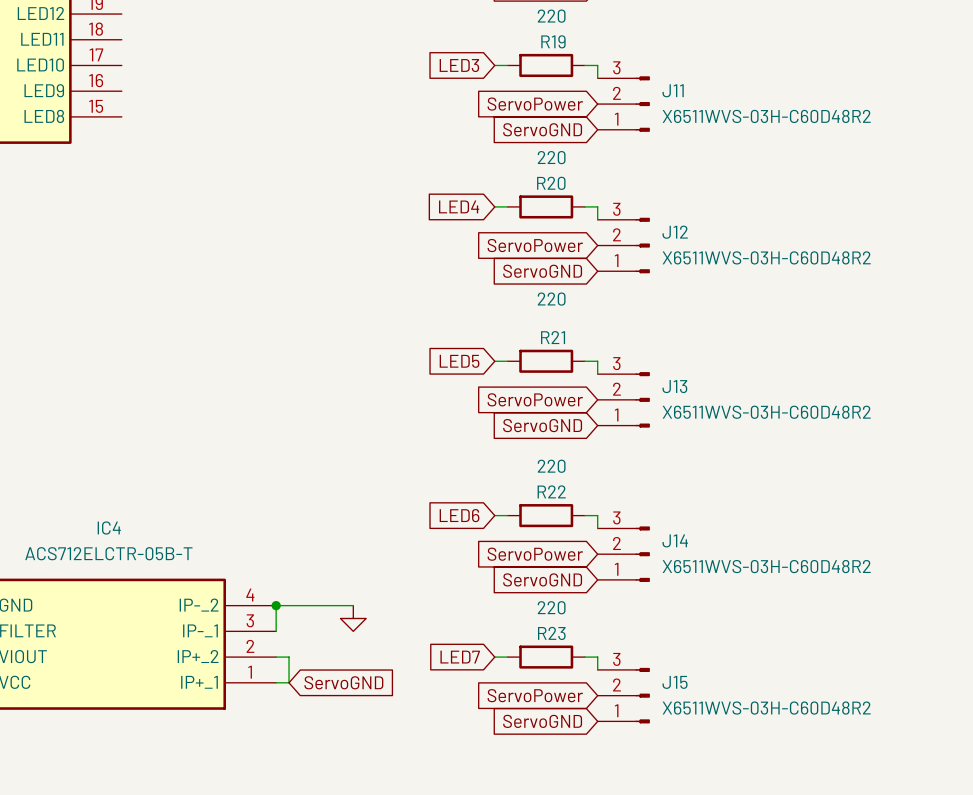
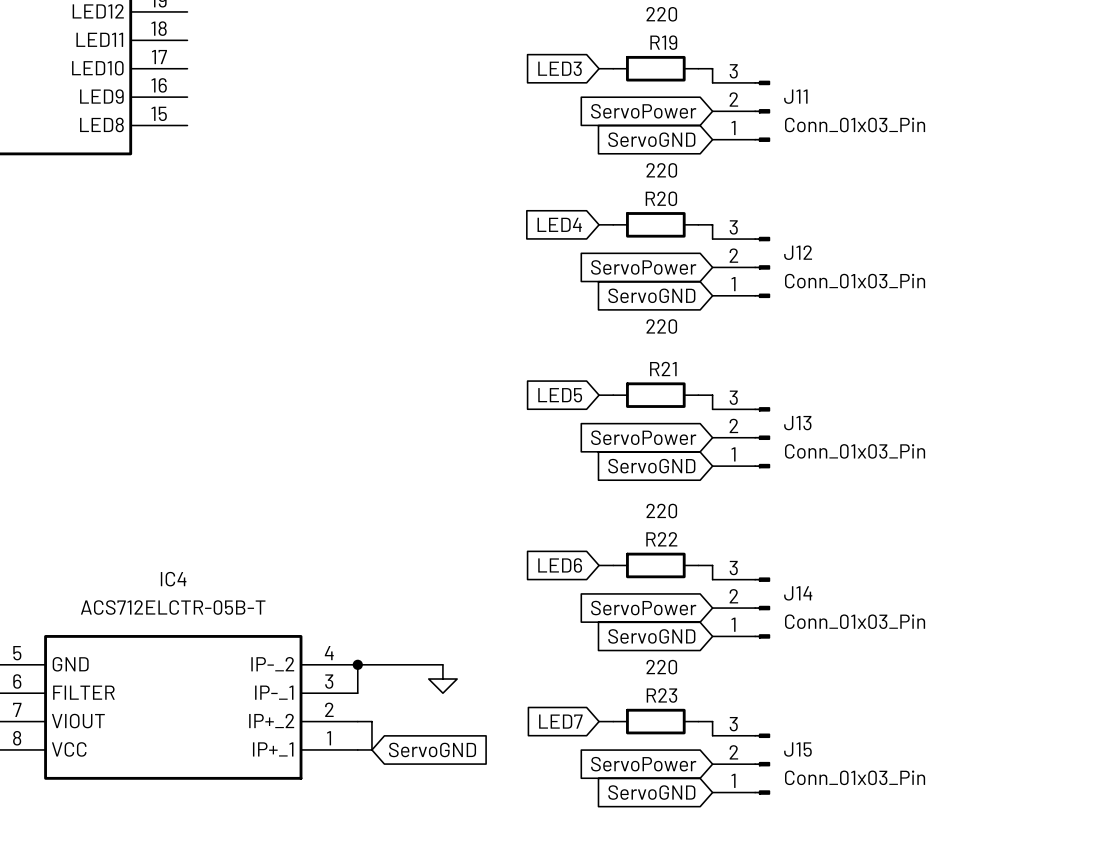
J11 value: X6511WVS-03H-C60D48R2 (766, 116) -> Conn_01x03_Pin (855, 124)
J12 value: X6511WVS-03H-C60D48R2 (766, 257) -> Conn_01x03_Pin (855, 281)
J13 value: X6511WVS-03H-C60D48R2 (766, 412) -> Conn_01x03_Pin (855, 451)
J14 value: X6511WVS-03H-C60D48R2 (766, 566) -> Conn_01x03_Pin (855, 621)
J15 value: X6511WVS-03H-C60D48R2 (766, 708) -> Conn_01x03_Pin (855, 777)

